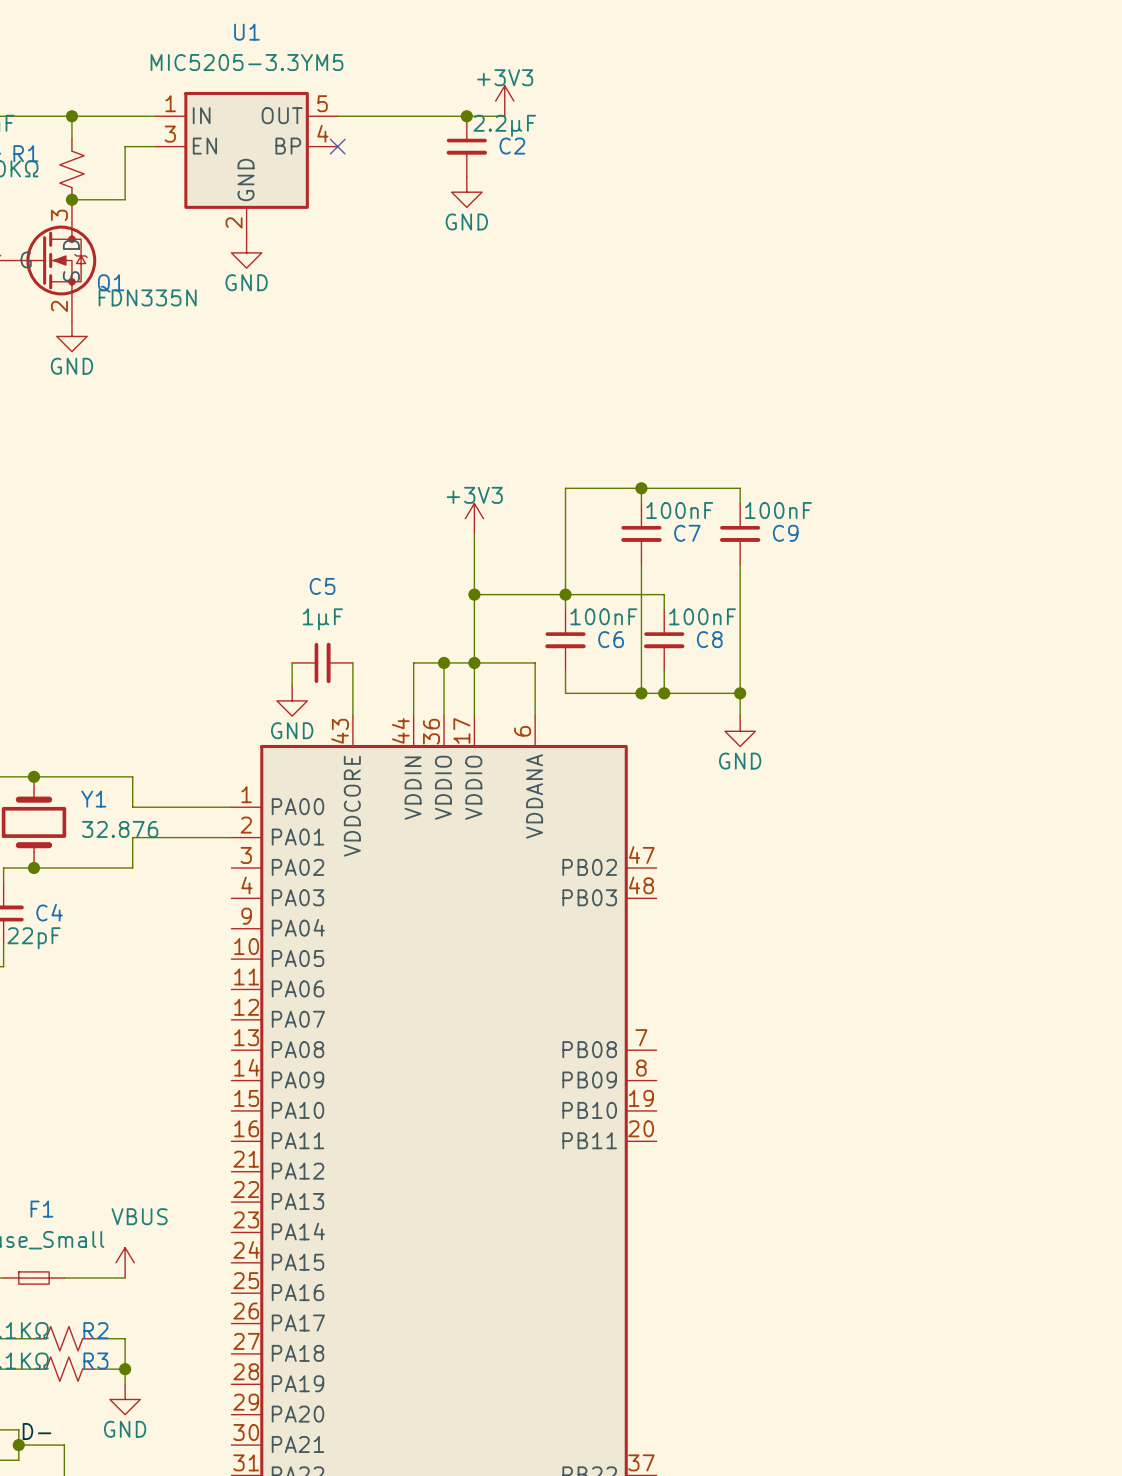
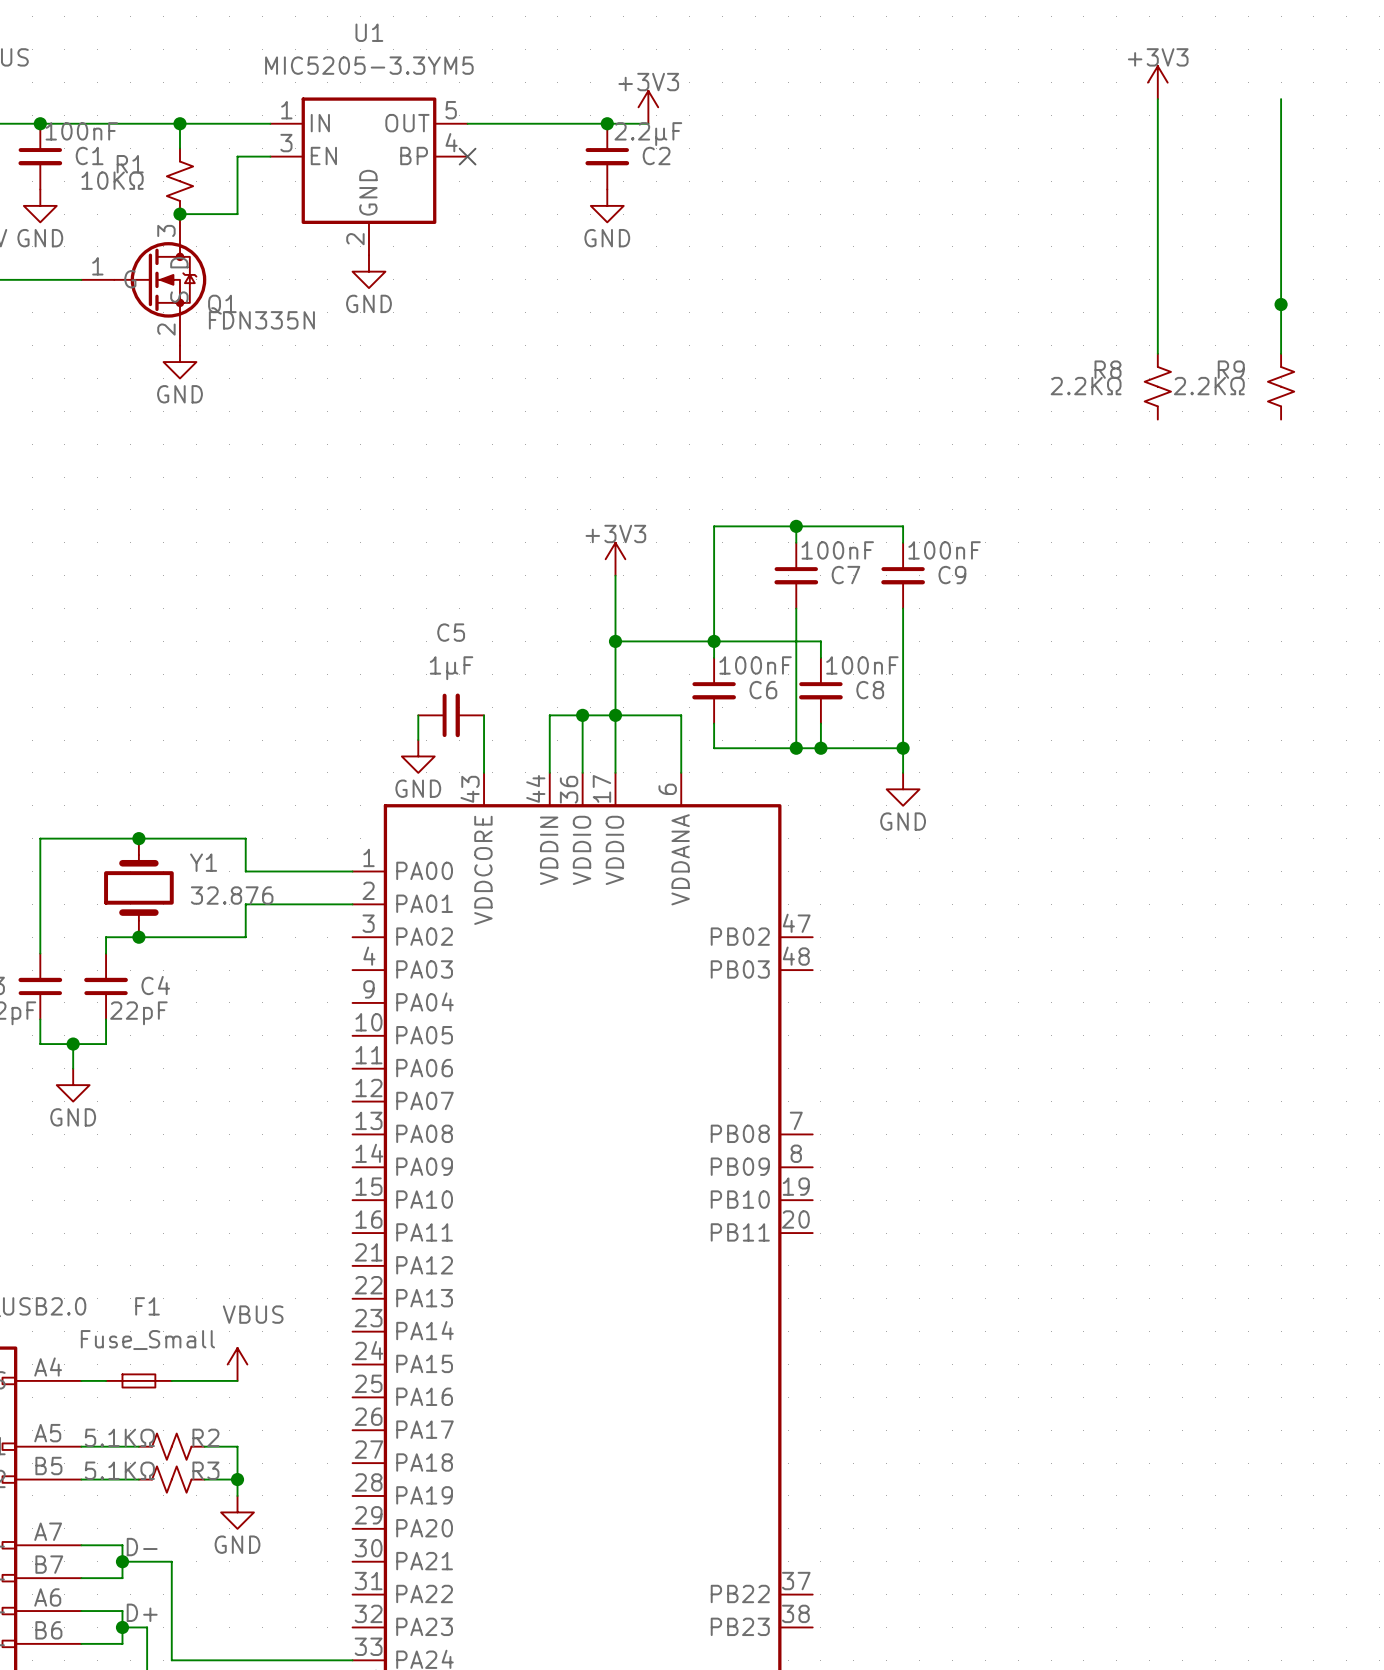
power symbol: none -> +3V3 (1157, 82)
wire: none -> (1157, 99) (1157, 353)
wire: none -> (1281, 99) (1281, 353)
junction: none -> (1281, 304)
R8: none -> 2.2KΩ (1157, 386)
R9: none -> 2.2KΩ (1281, 386)

